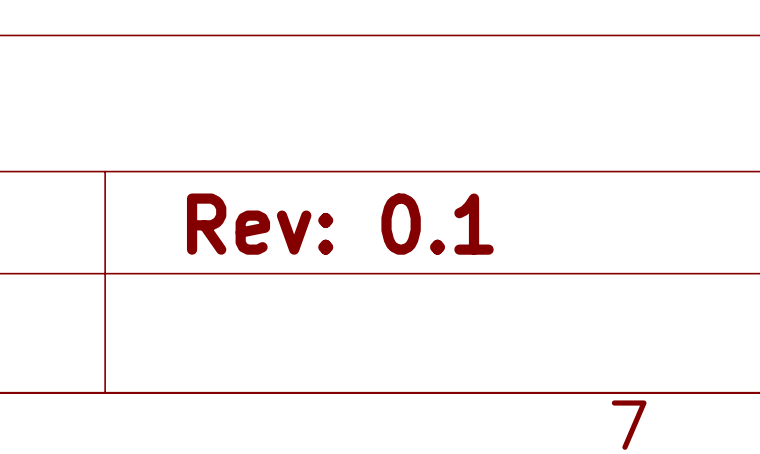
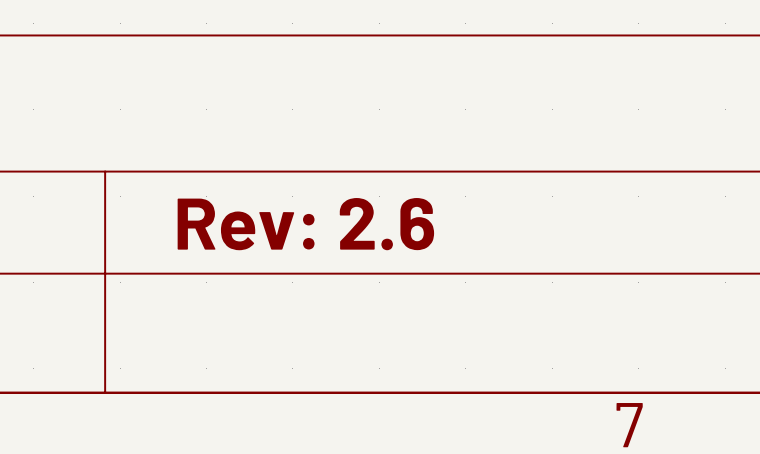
title block: Rev: 0.1 (340, 224) -> Rev: 2.6 (305, 224)

